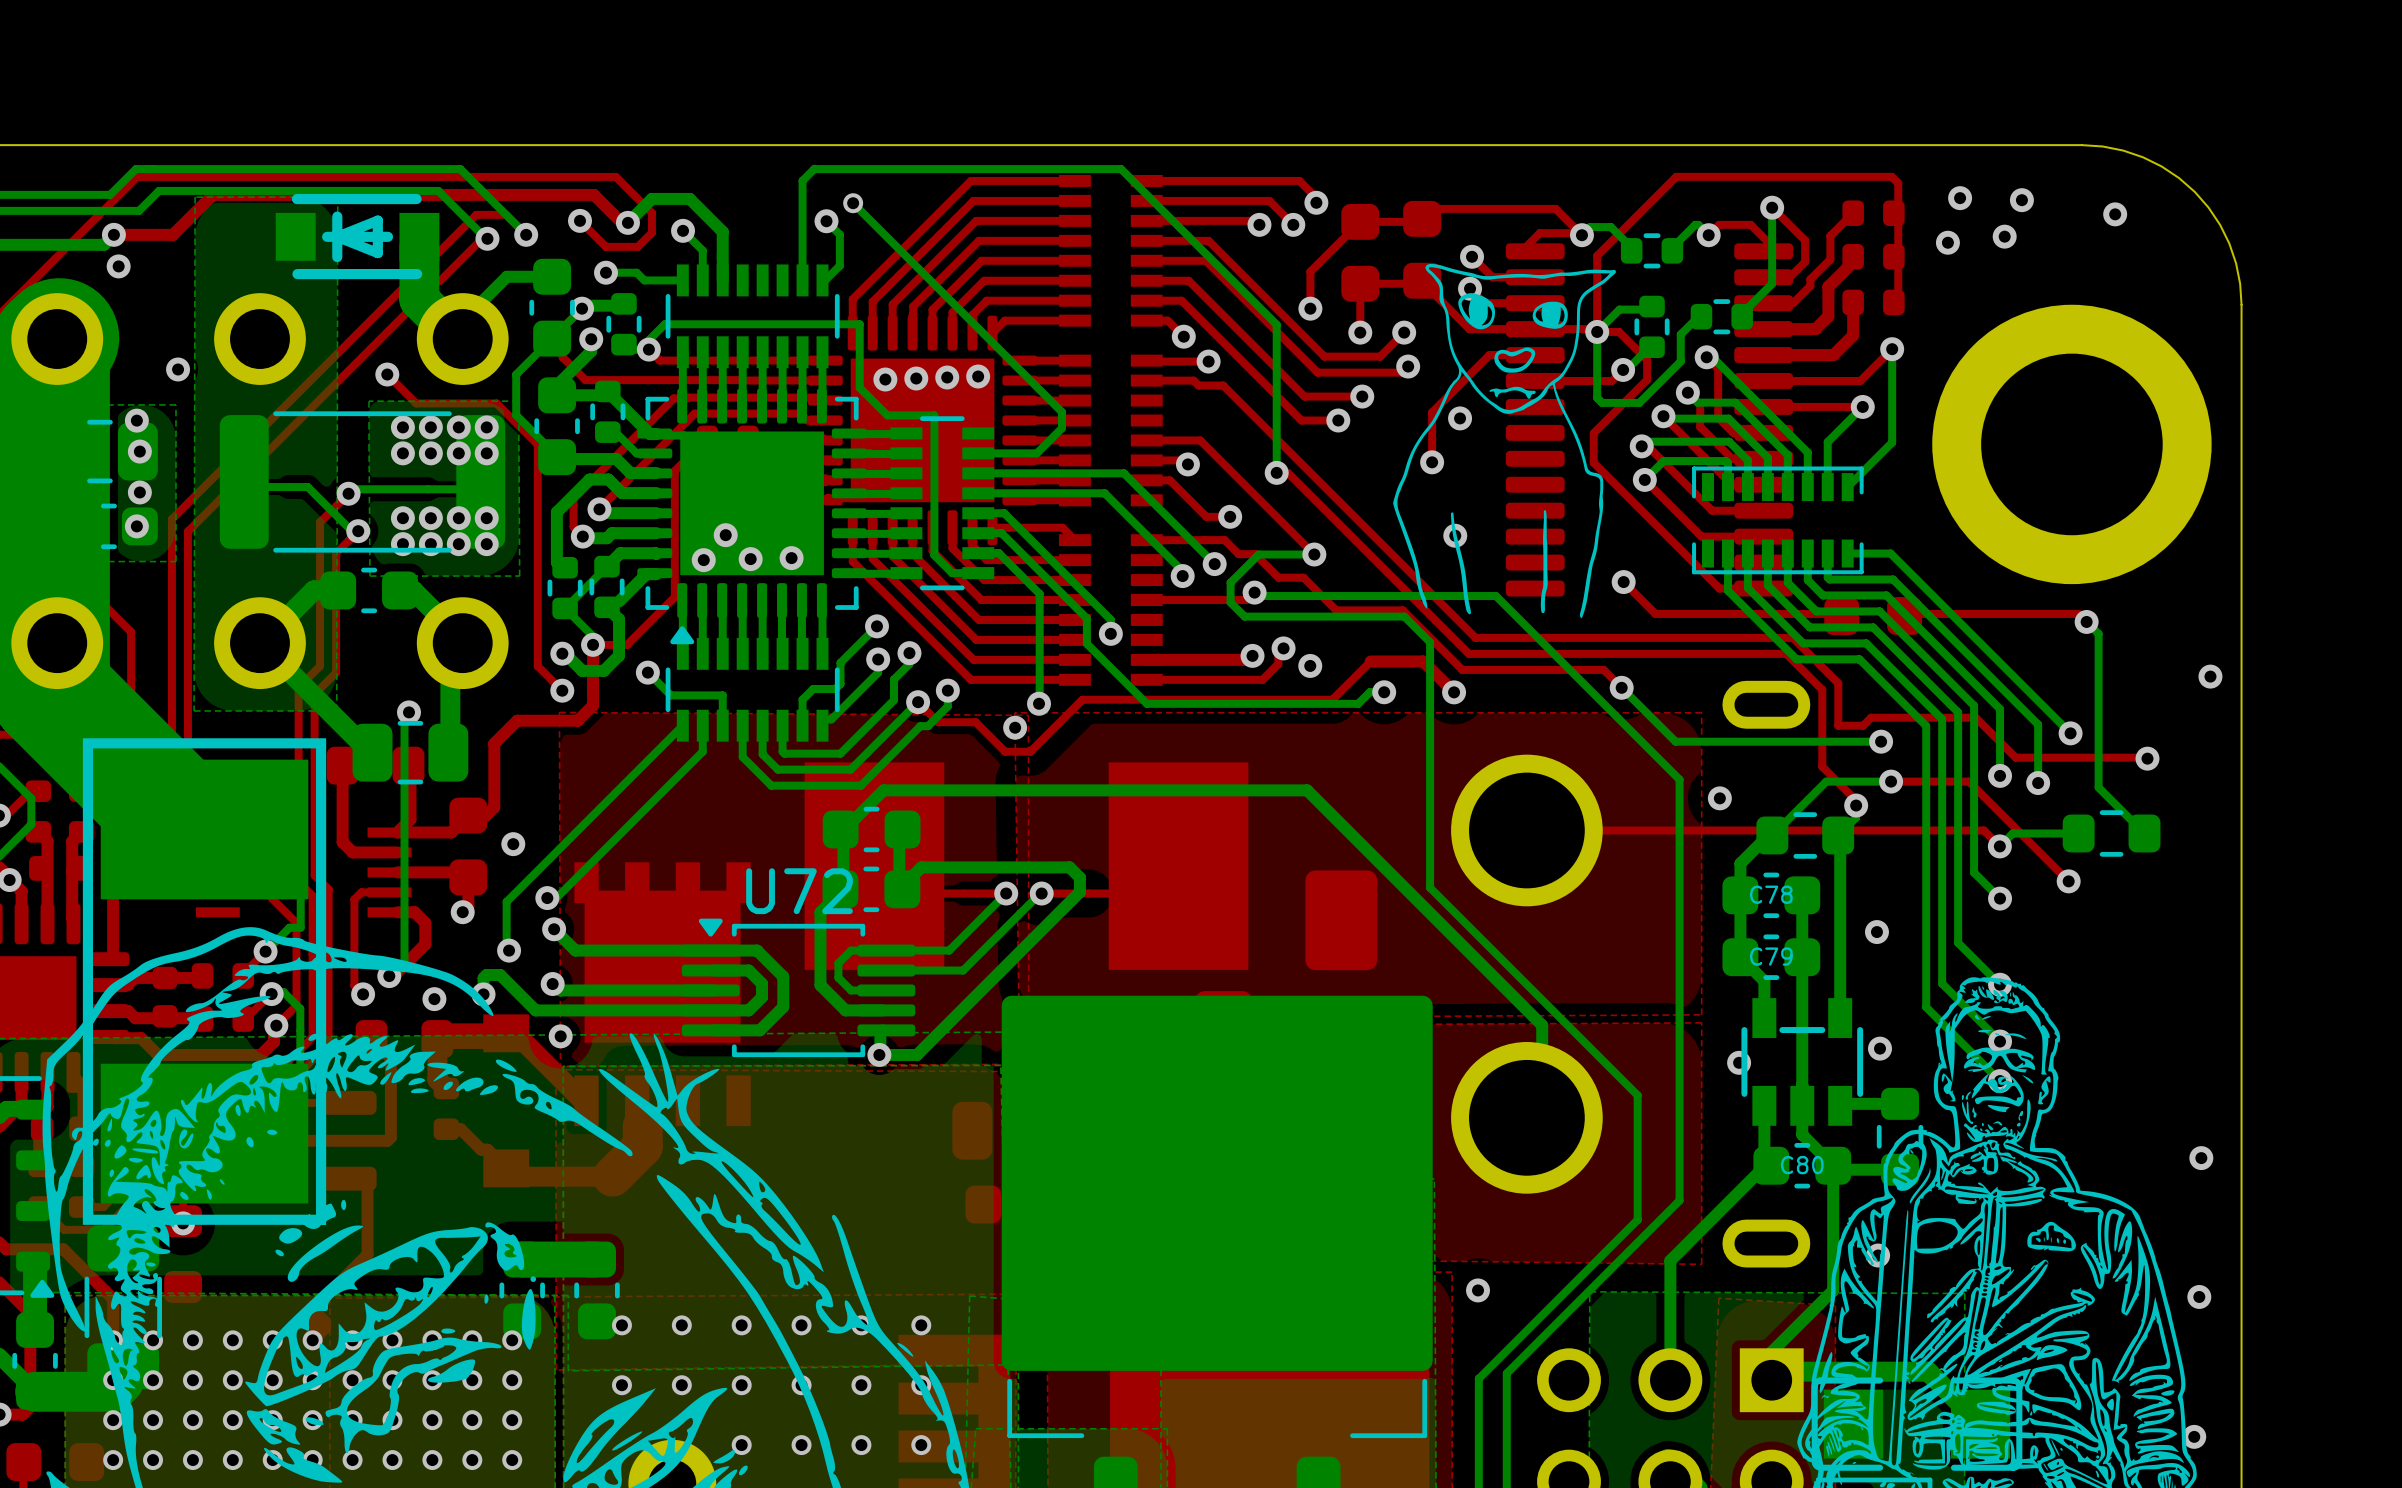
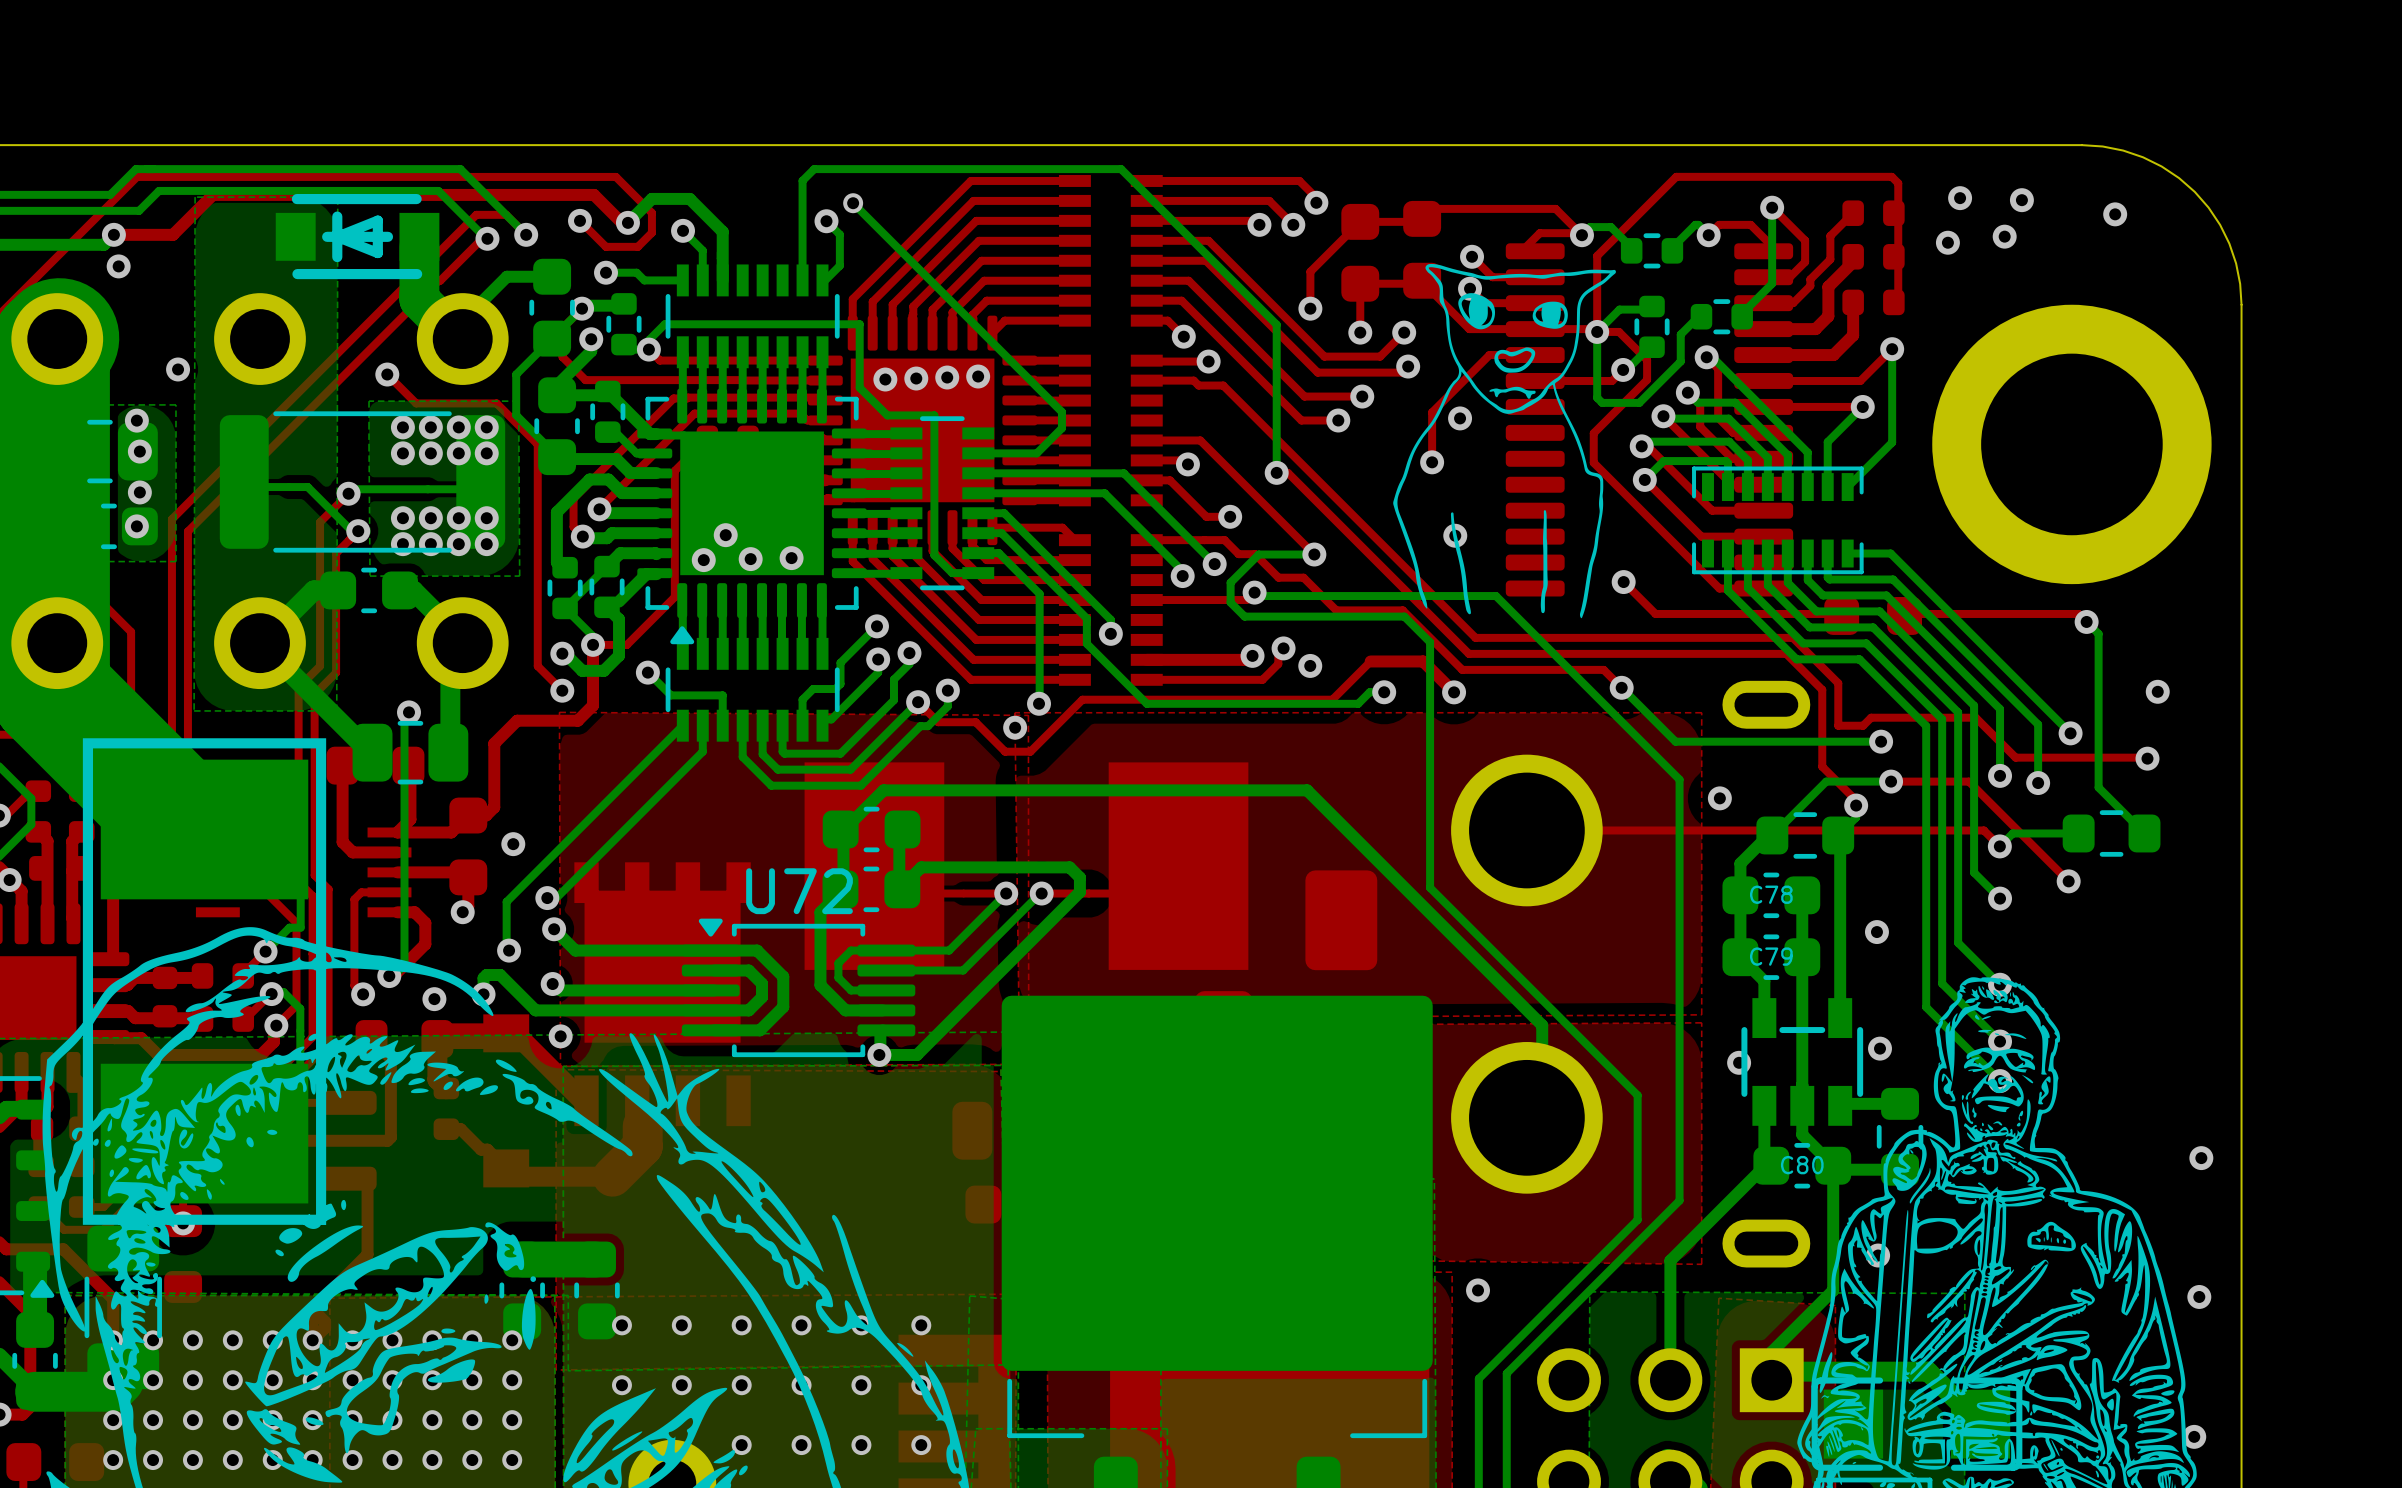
via position: (2210, 676) -> (2157, 691)

